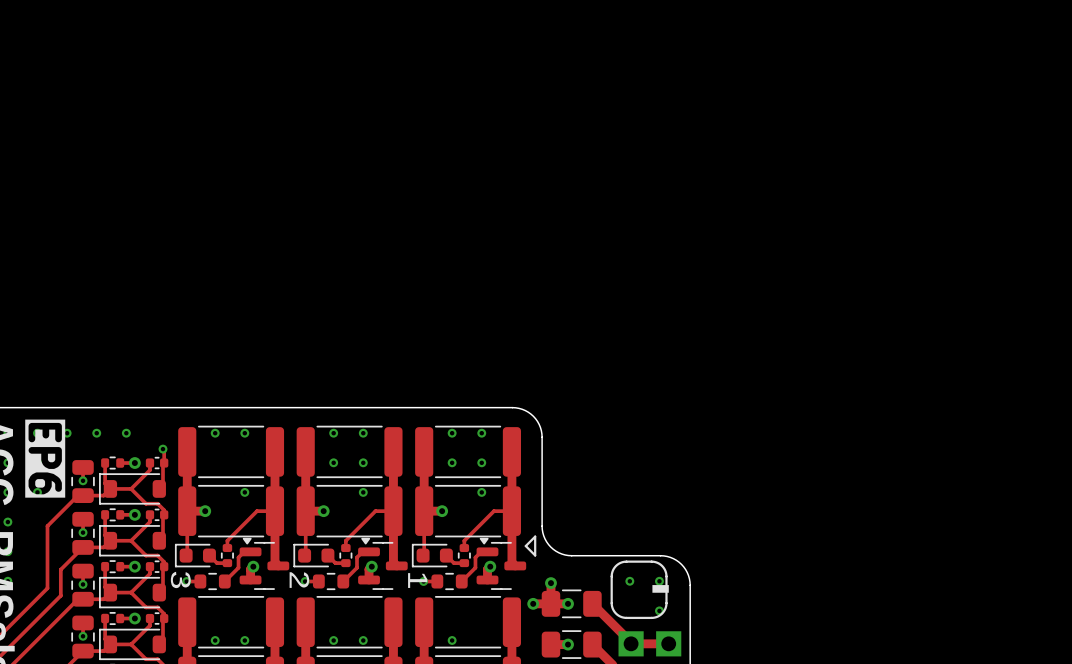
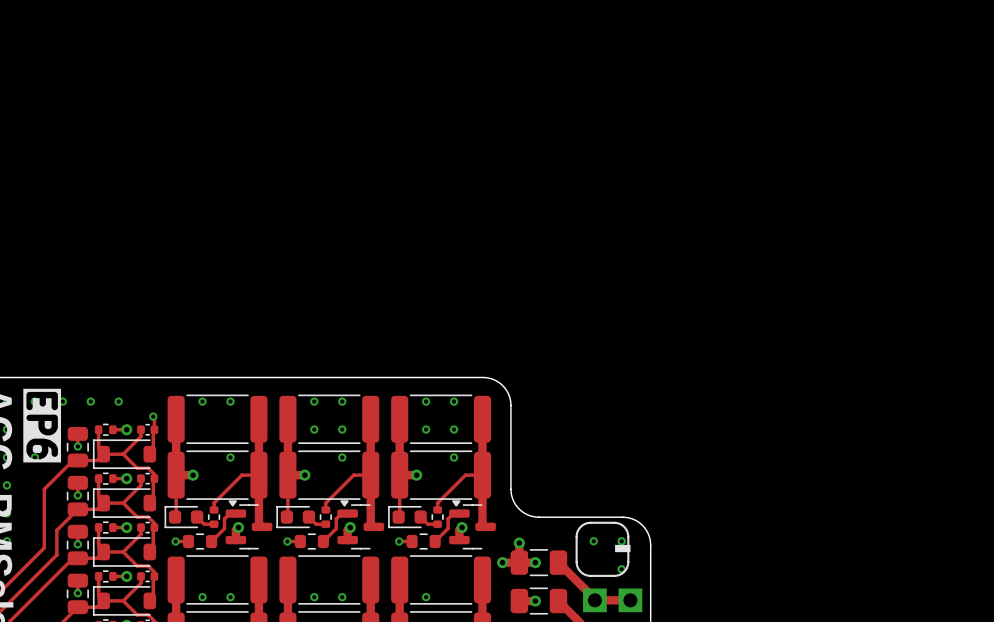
line: (535, 536) (535, 555) (525, 546) (535, 536) -> none
text: 3 (180, 579) -> none
text: 2 (299, 580) -> none
text: 1 (417, 580) -> none

